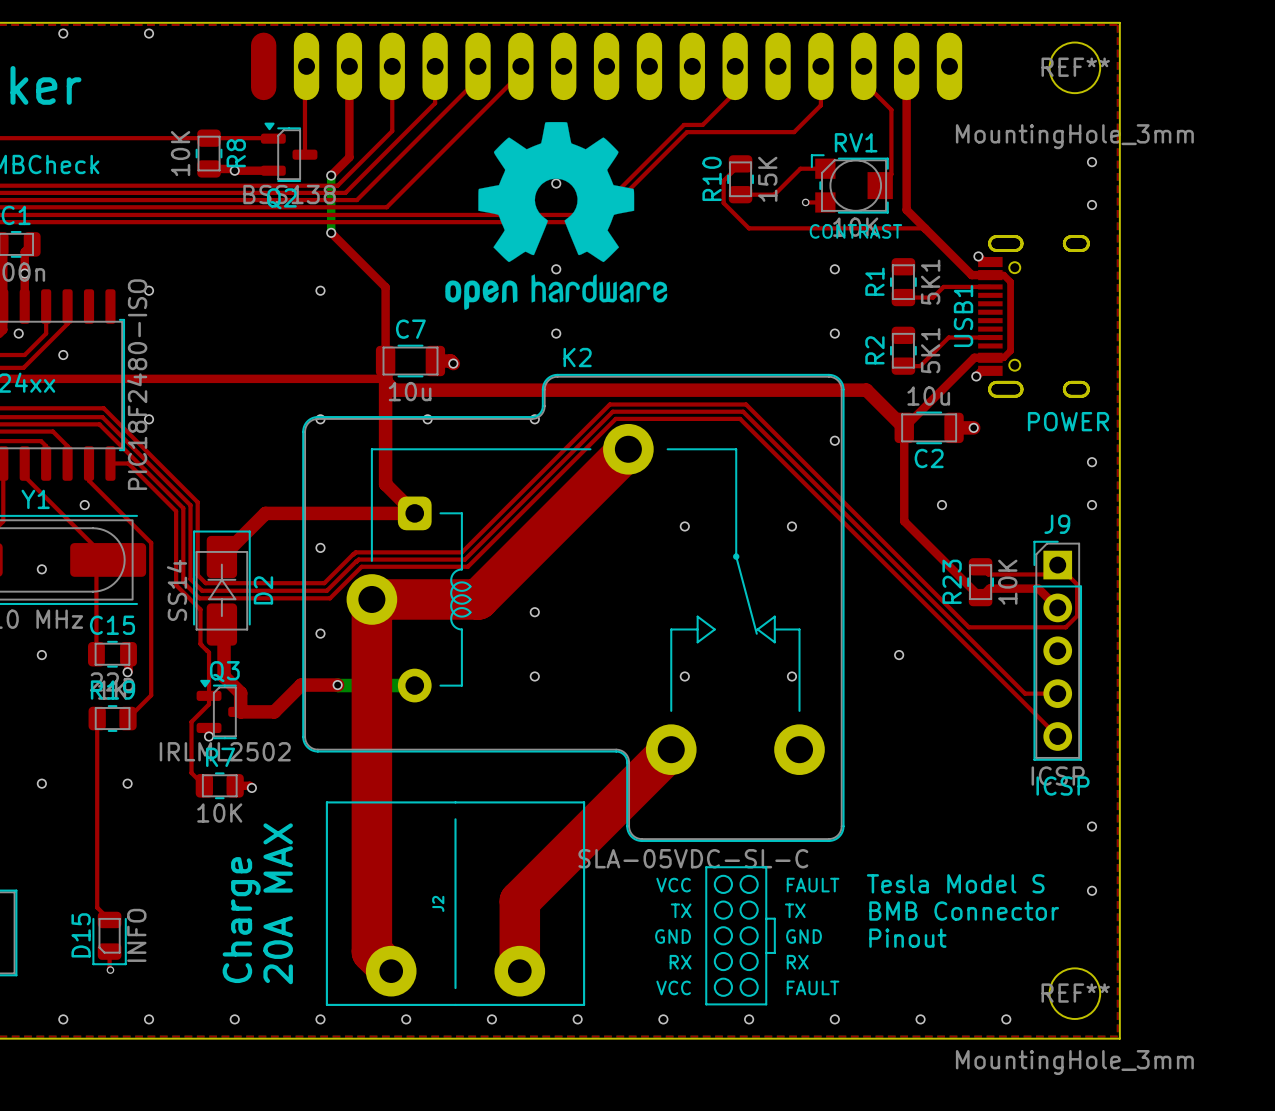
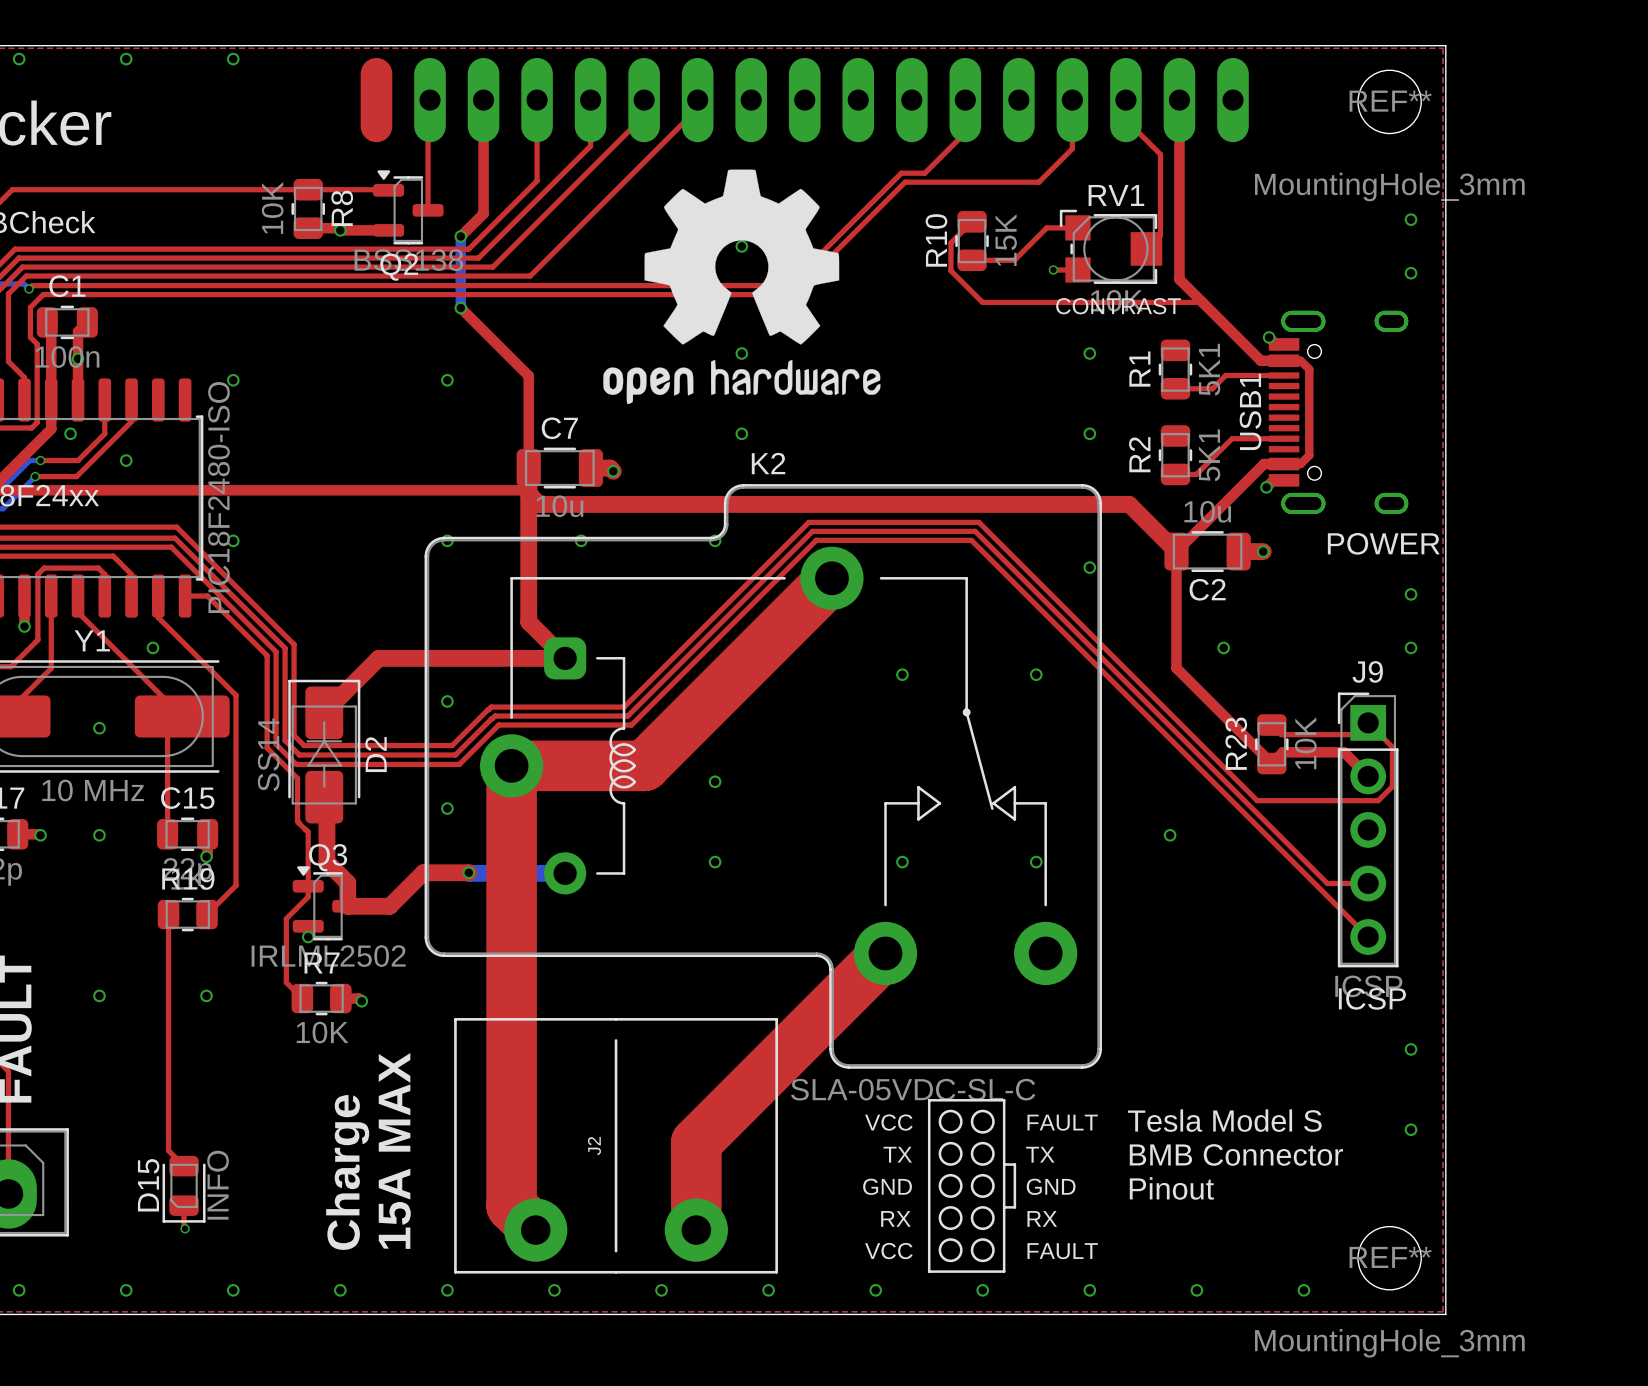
text: 20A MAX (278, 903) -> 15A MAX (394, 1150)

